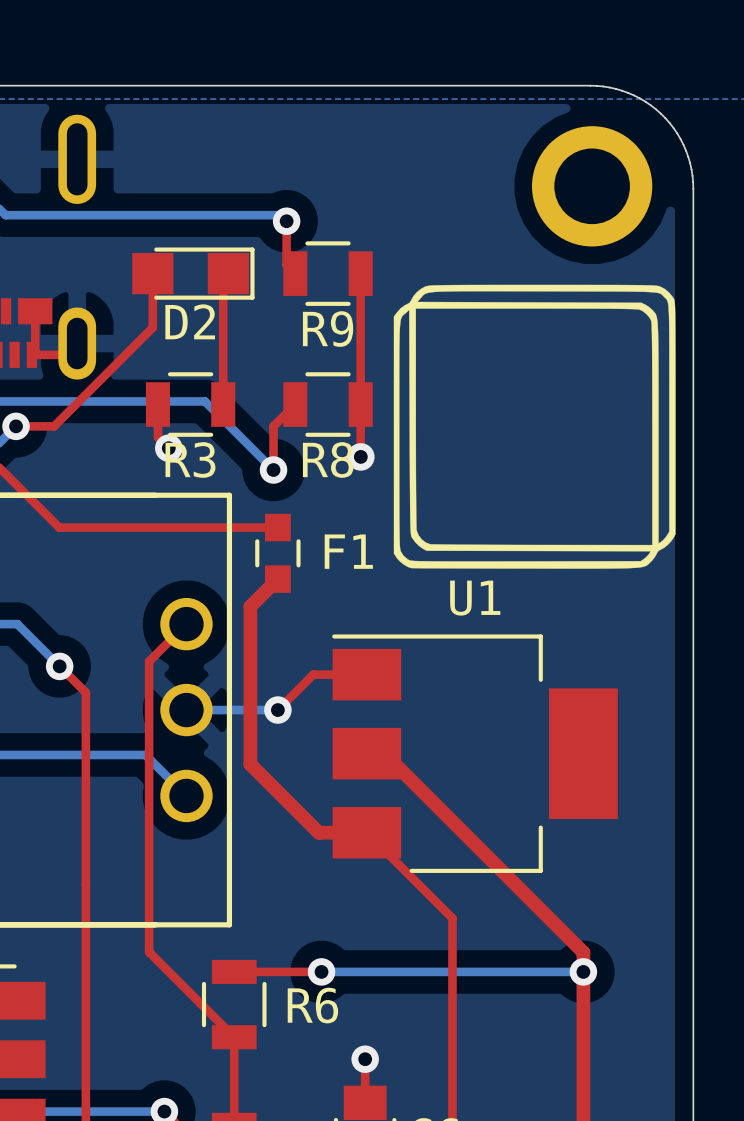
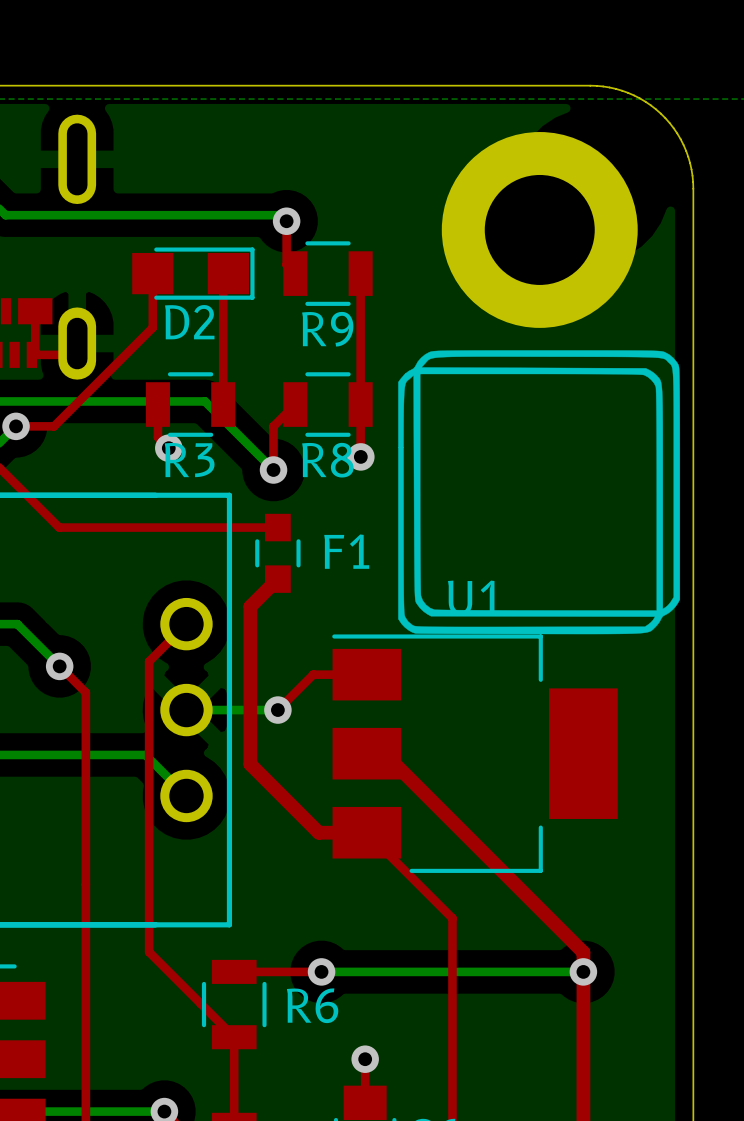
part: (592, 186) -> none
part: none -> (539, 229)
drawing position: (534, 426) -> (539, 492)

